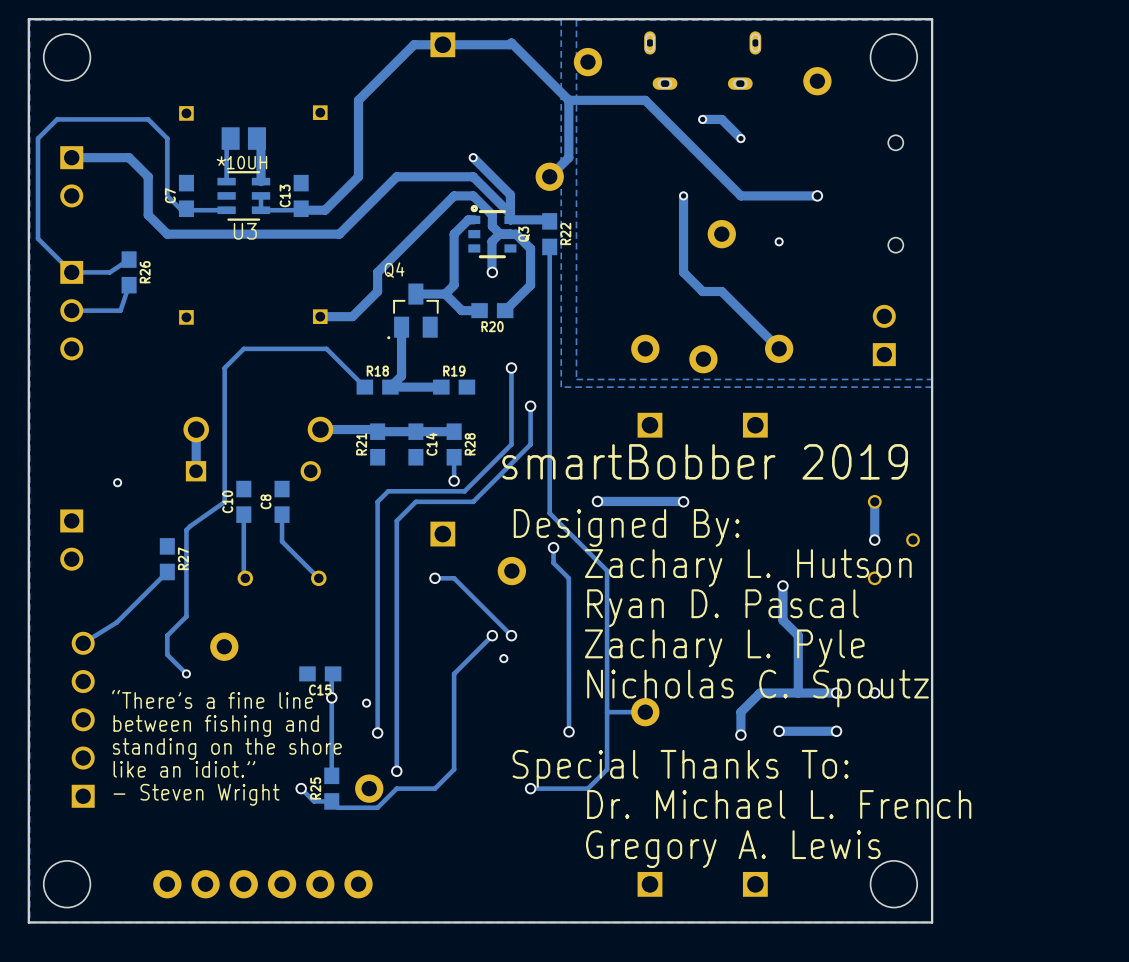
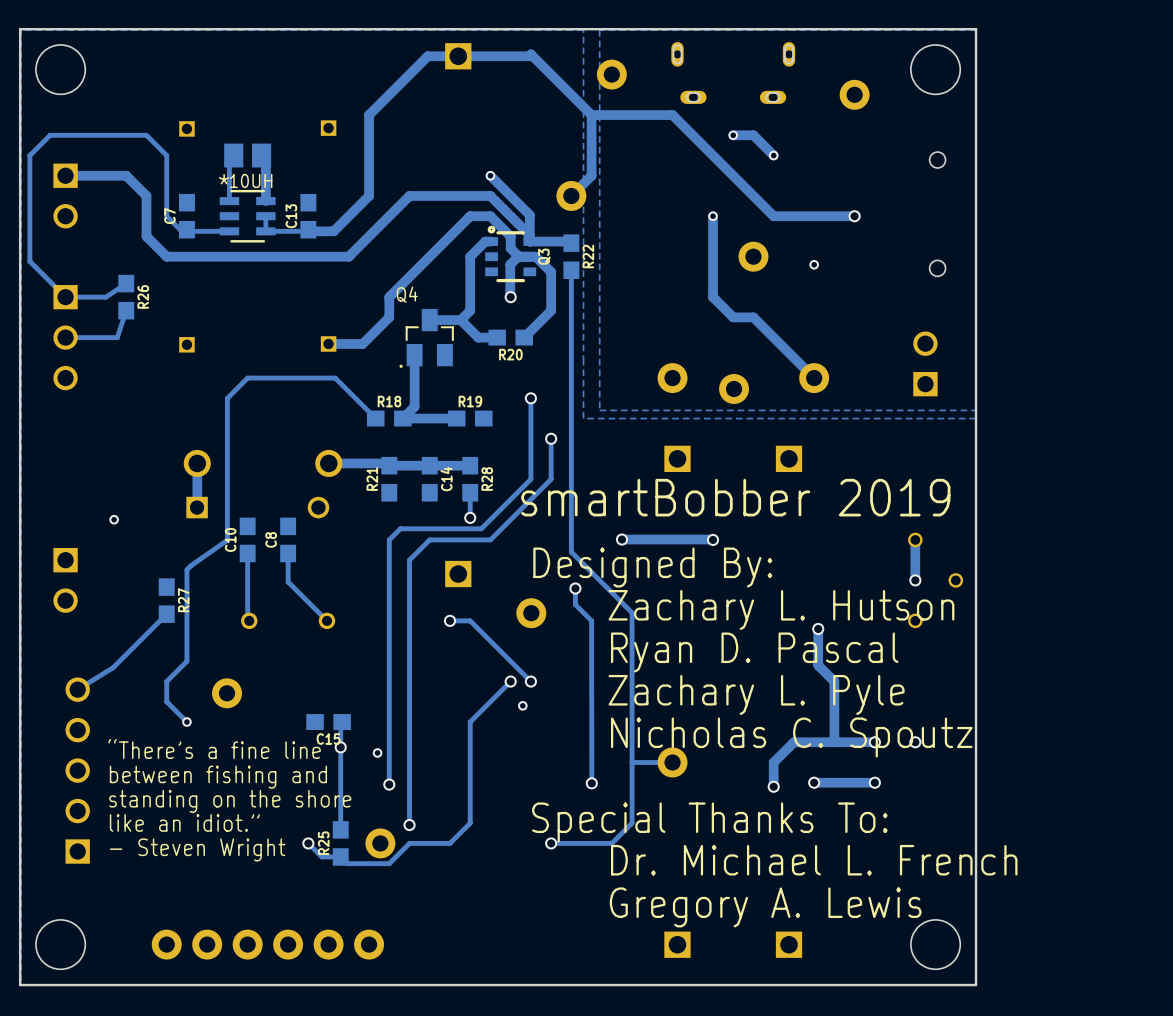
text: U3 (245, 231) -> none

